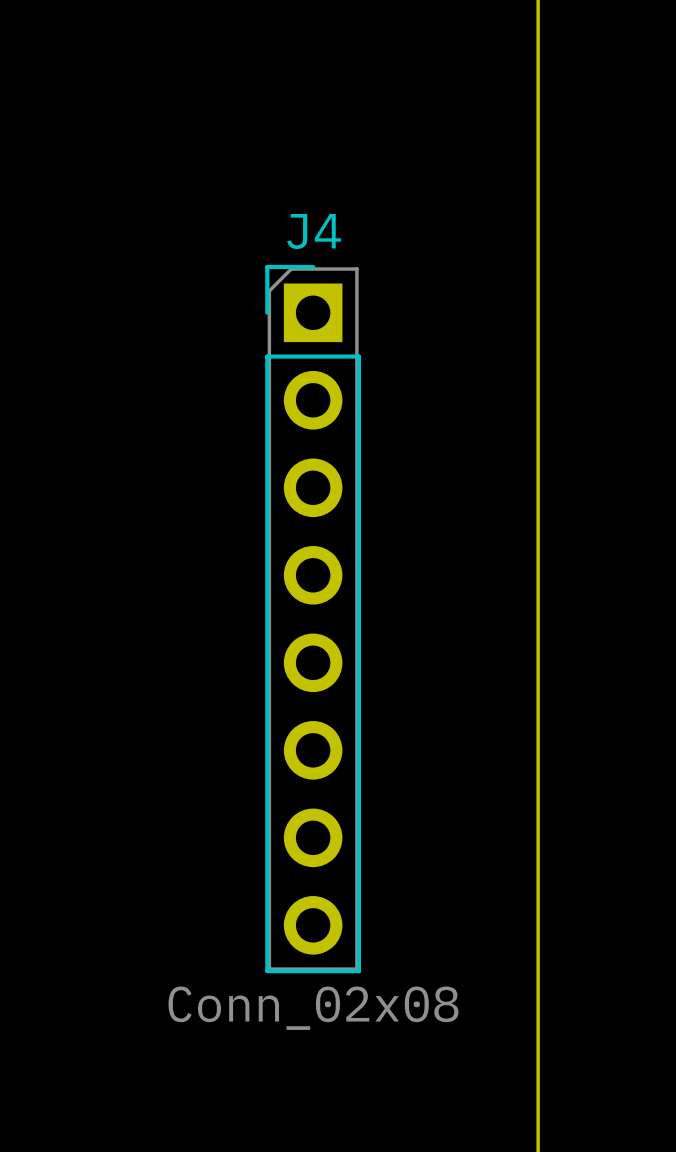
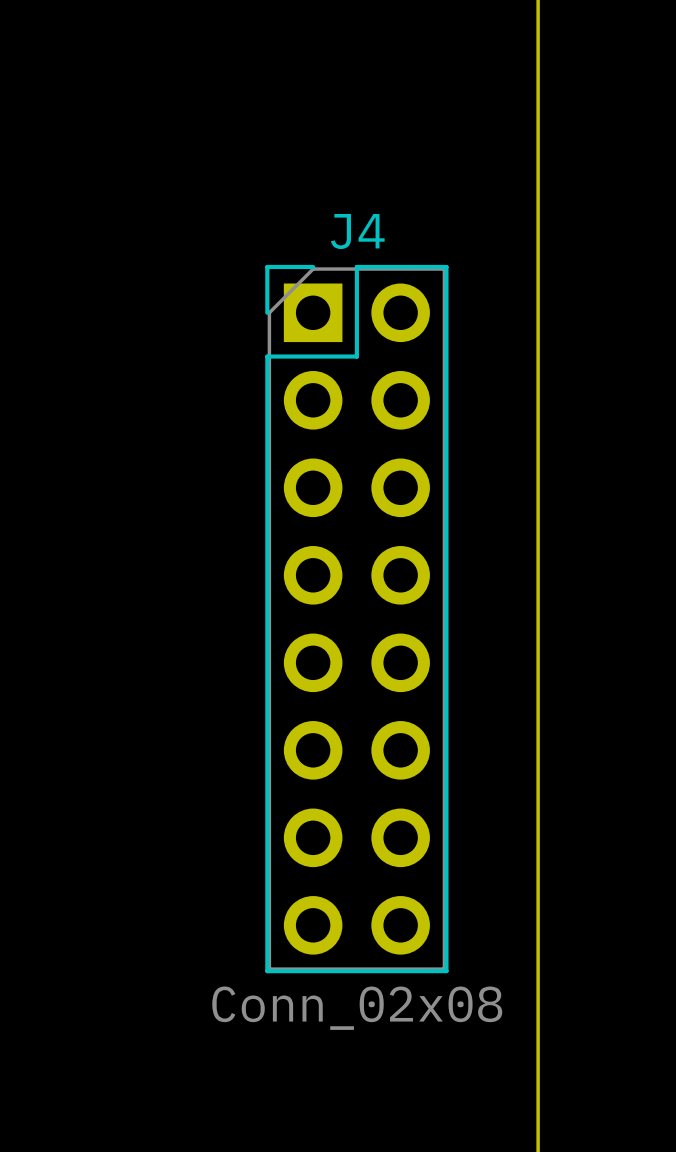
J4 footprint: [265, 264, 362, 974] -> [265, 264, 449, 974]

